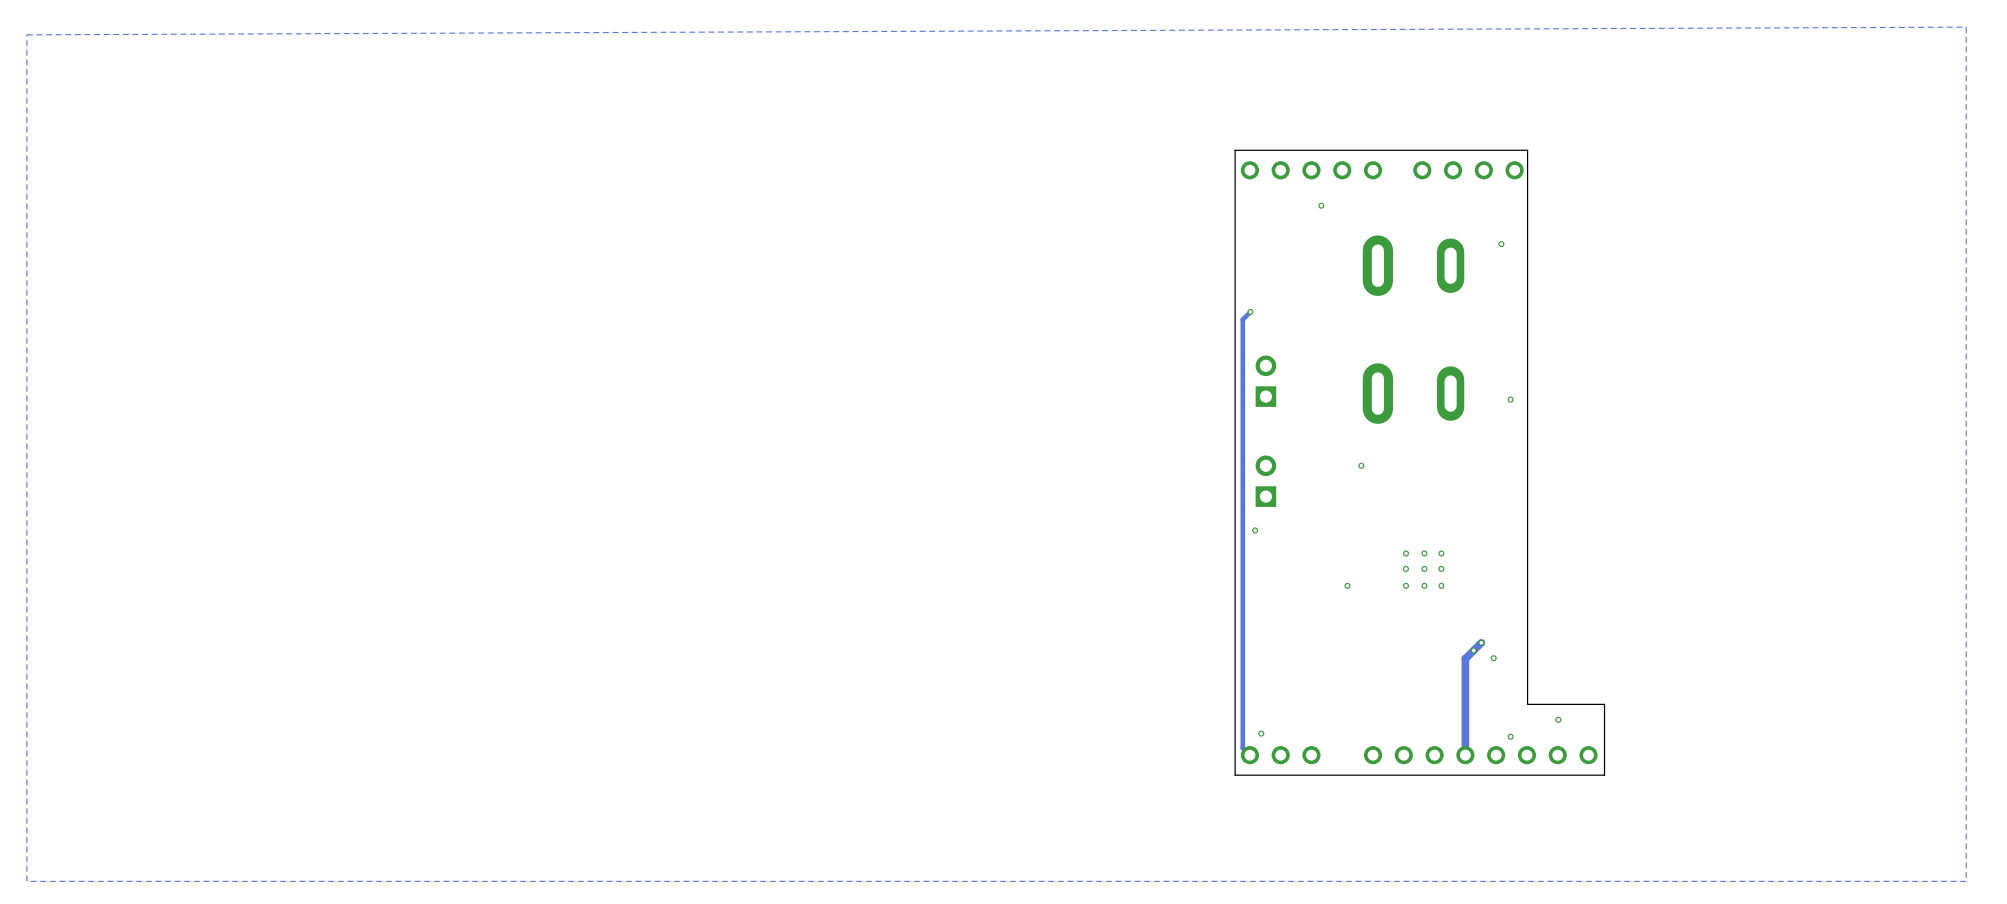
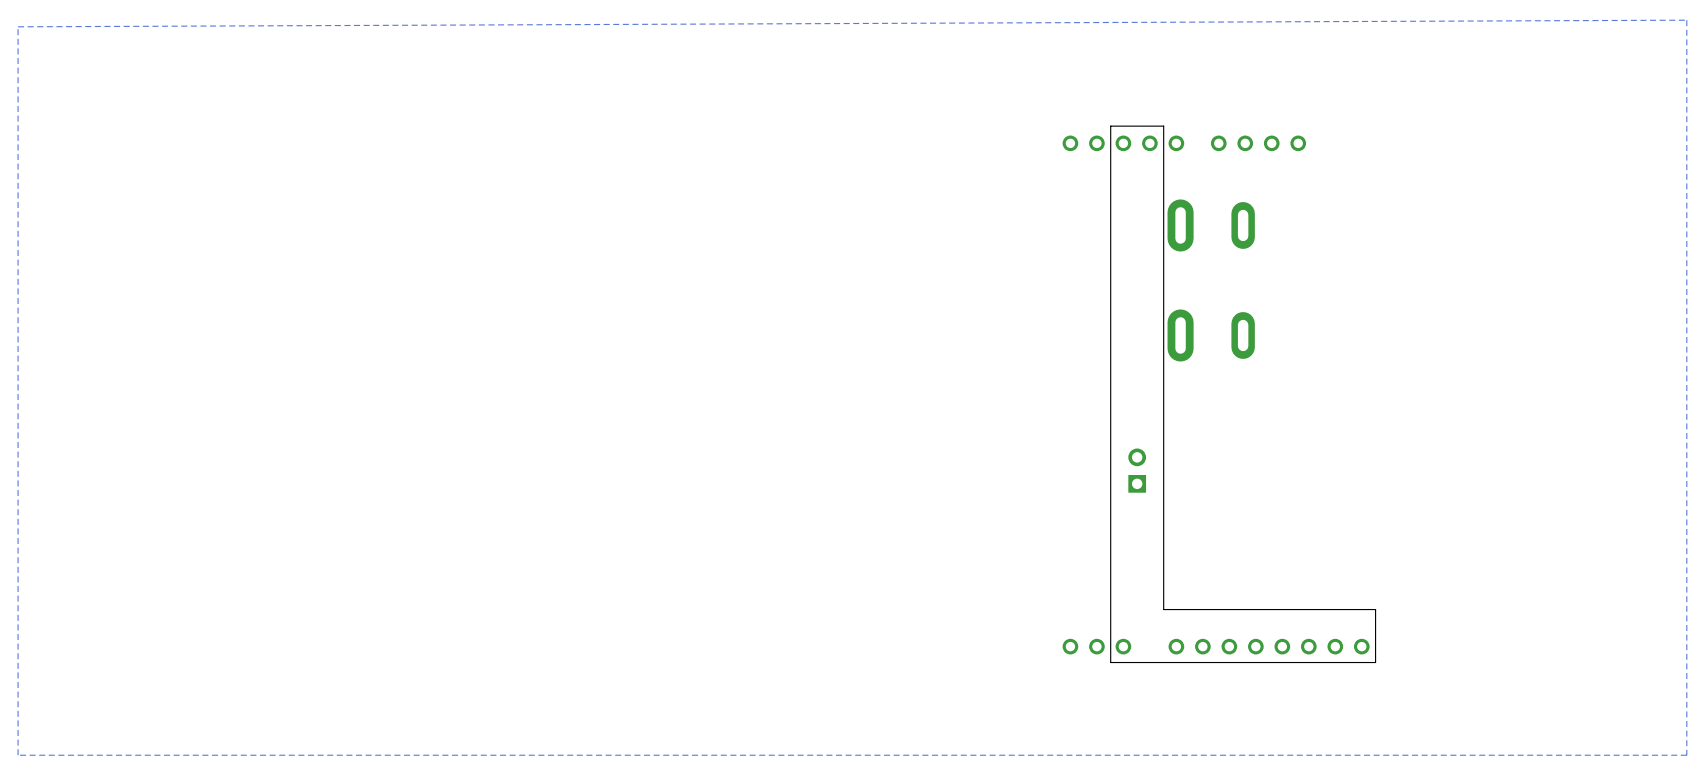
board edge: (1296, 150) (1235, 150) (1235, 775) (1604, 775) (1604, 773) -> (1110, 126) (1110, 662) (1375, 662)
board edge: (1358, 150) (1527, 150) (1527, 704) (1604, 704) (1604, 712) -> (1163, 126) (1163, 609) (1375, 609)
via: (1321, 205) -> none
via: (1501, 244) -> none
track: (1250, 311) (1242, 319) (1242, 748) (1249, 755) -> none
via: (1250, 311) -> none
part: (1265, 381) -> none
via: (1510, 399) -> none
via: (1361, 465) -> none
part: (1265, 481) -> none
via: (1255, 530) -> none
part: none -> (1137, 470)
via: (1405, 553) -> none
via: (1424, 553) -> none
via: (1441, 553) -> none
via: (1405, 568) -> none
via: (1424, 568) -> none
via: (1441, 568) -> none
via: (1347, 585) -> none
via: (1405, 585) -> none
via: (1424, 585) -> none
via: (1441, 585) -> none
track: (1481, 642) (1465, 658) (1465, 755) -> none
via: (1481, 642) -> none
via: (1473, 650) -> none
via: (1493, 658) -> none
via: (1558, 719) -> none
via: (1261, 733) -> none
via: (1510, 736) -> none

